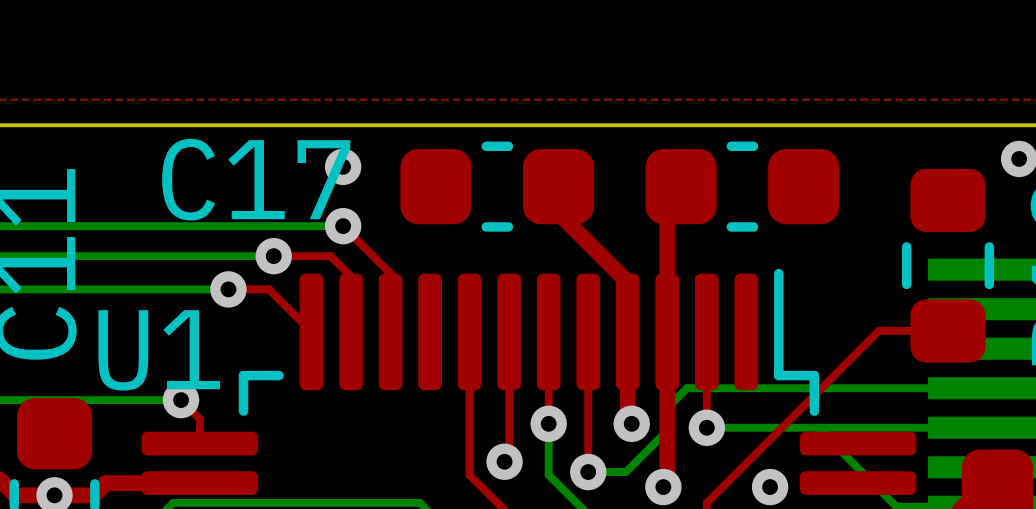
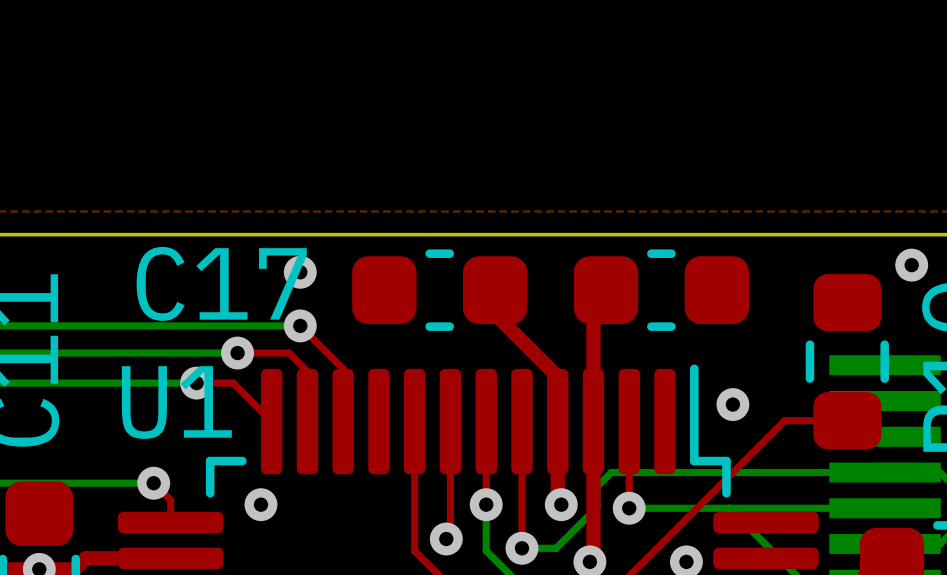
via: none -> (732, 404)
U1 name position: U1 (159, 350) -> U1 (176, 402)
via: none -> (260, 504)

